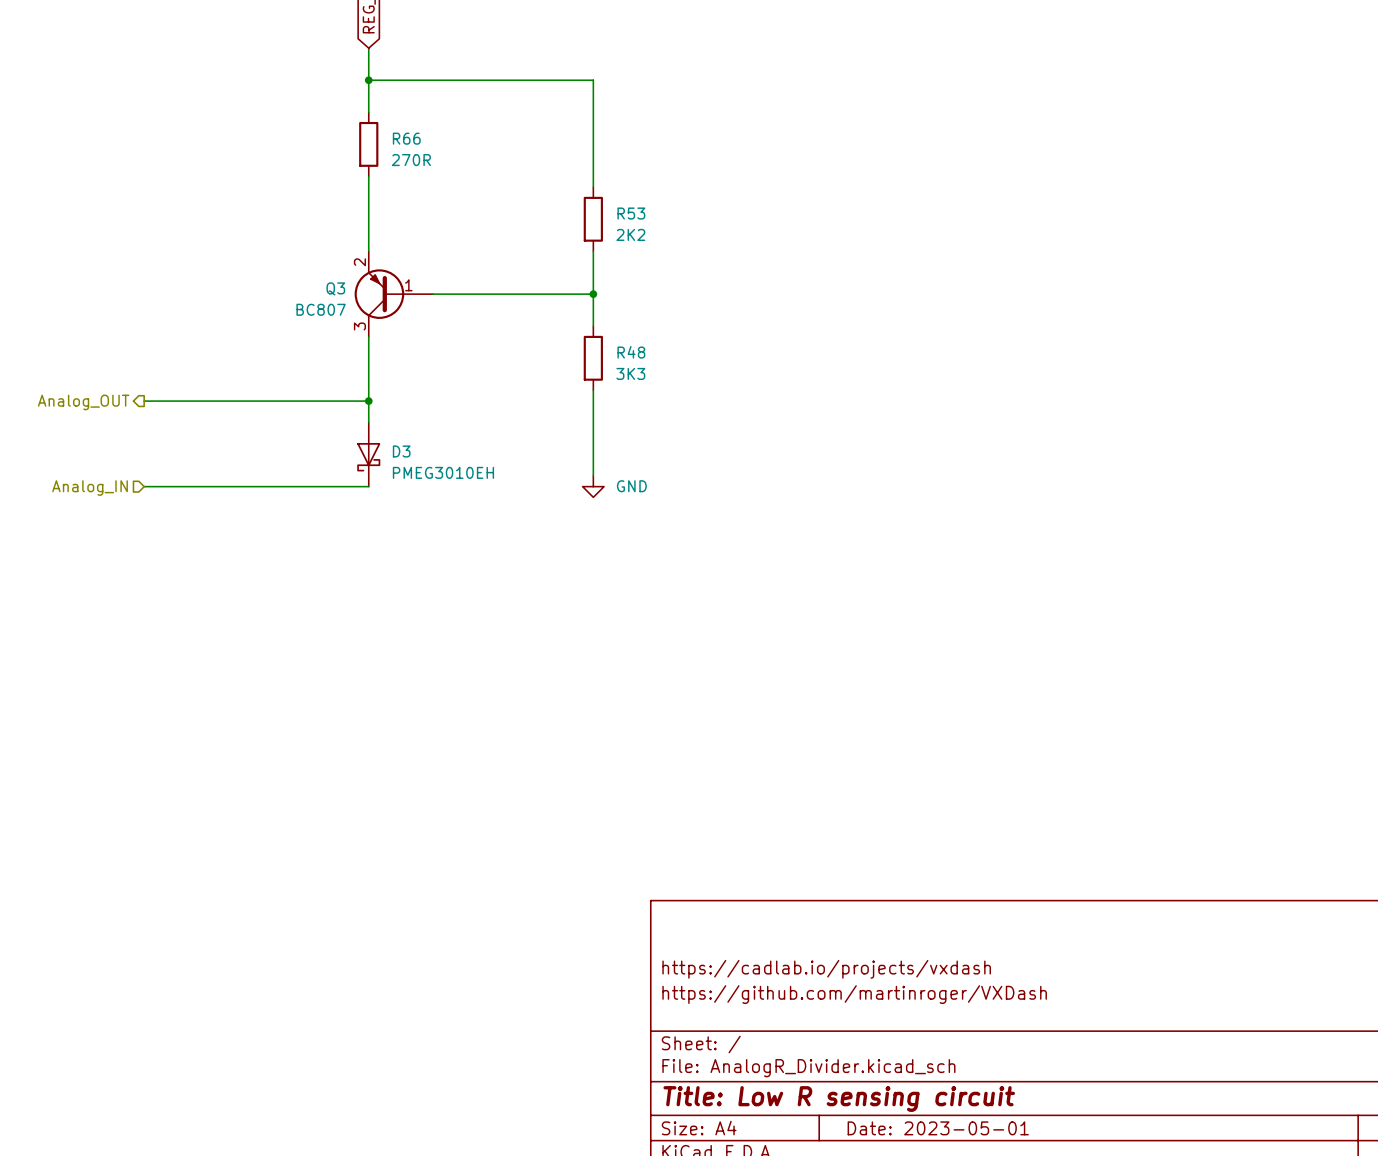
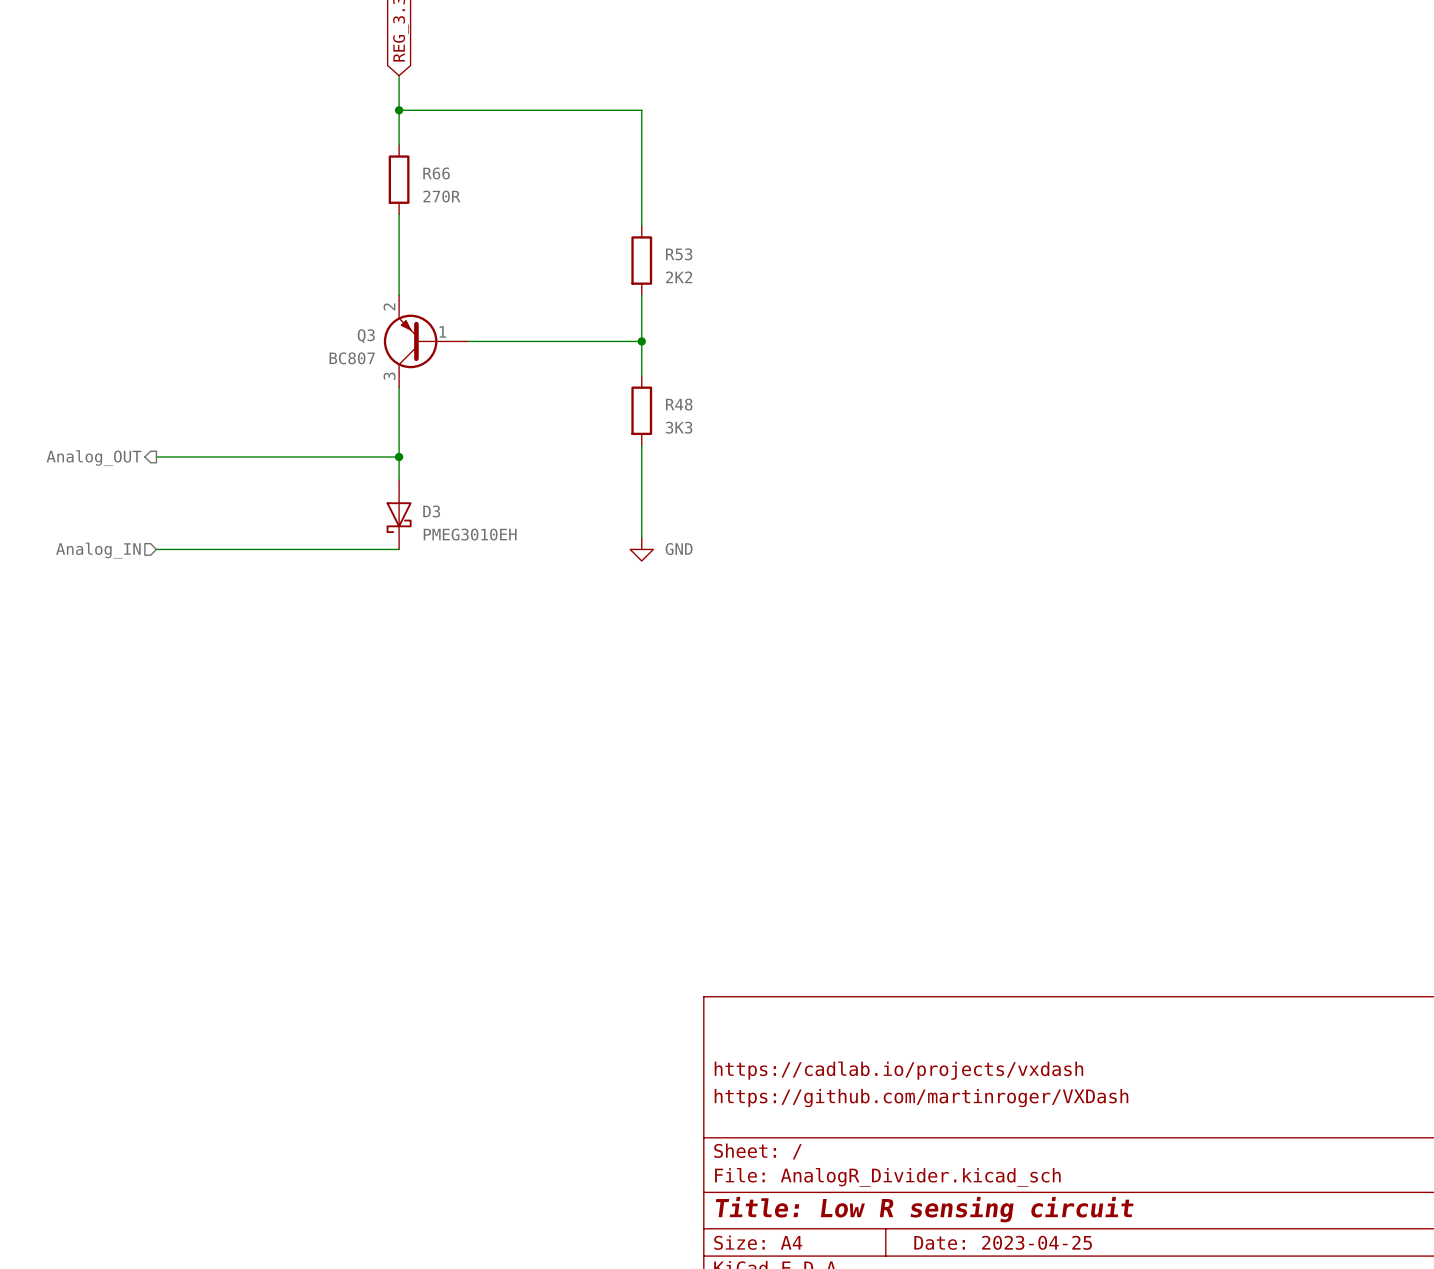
title block: Date: 2023-05-01 (938, 1128) -> Date: 2023-04-25 (1003, 1242)

